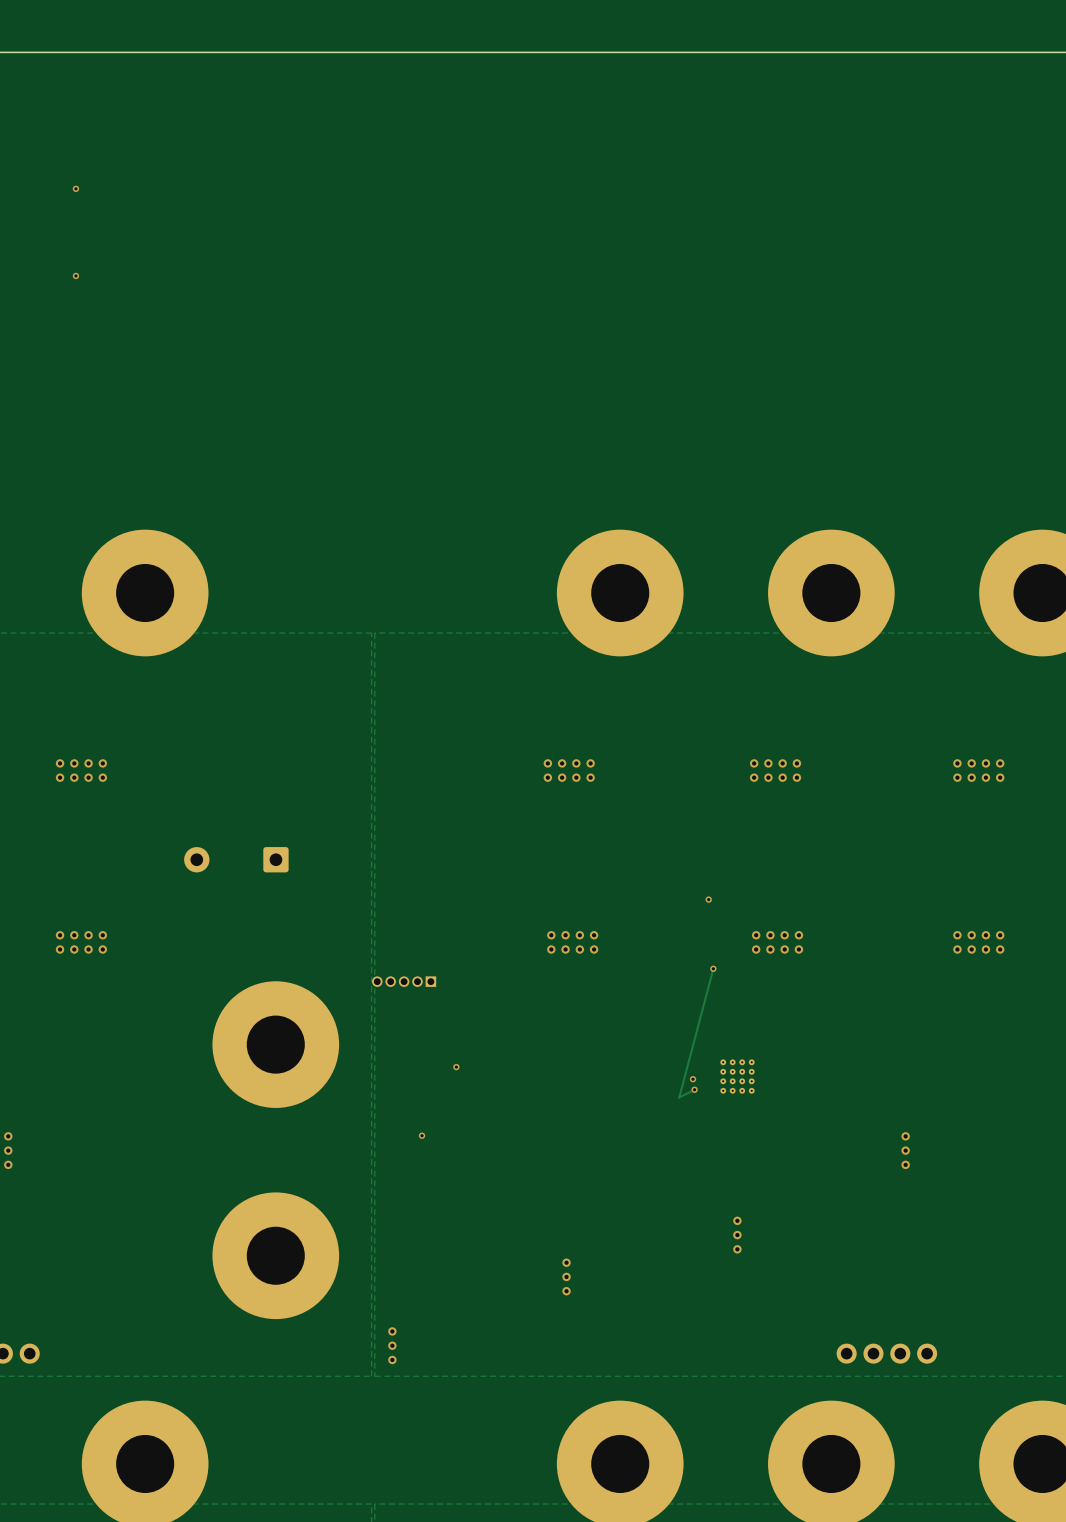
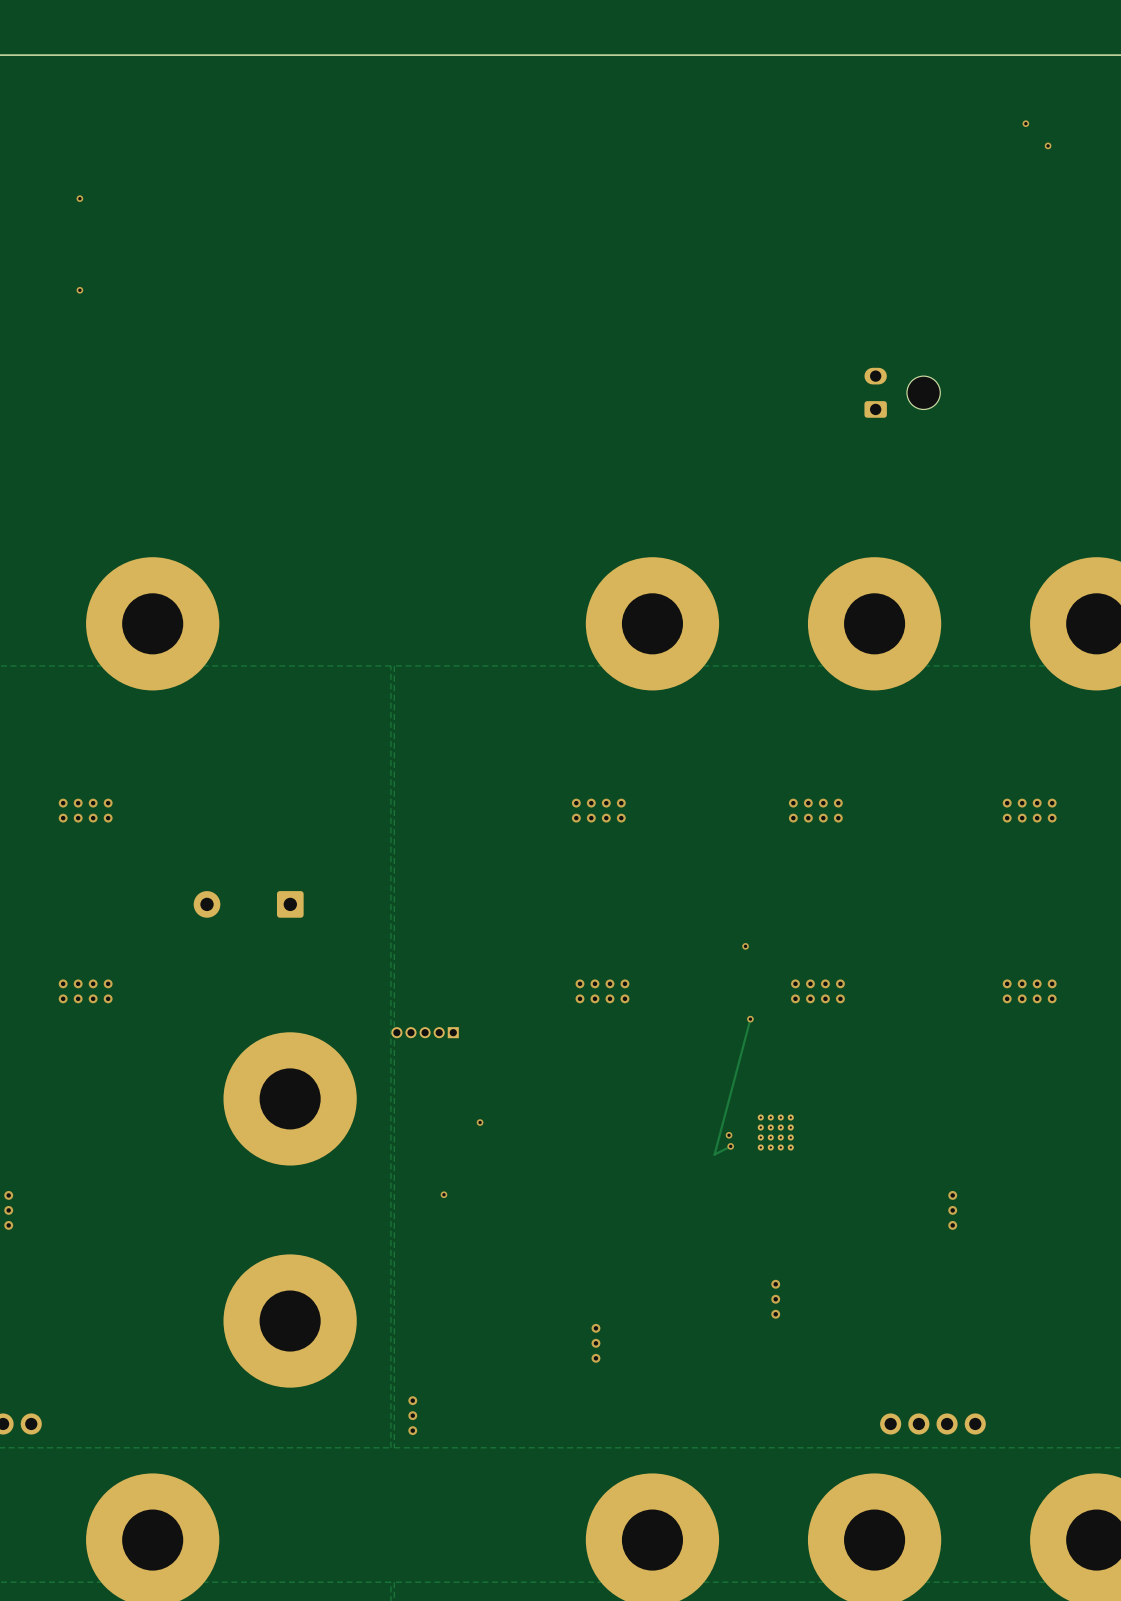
via: none -> (1025, 123)
via: none -> (1048, 145)
part: none -> (902, 392)

